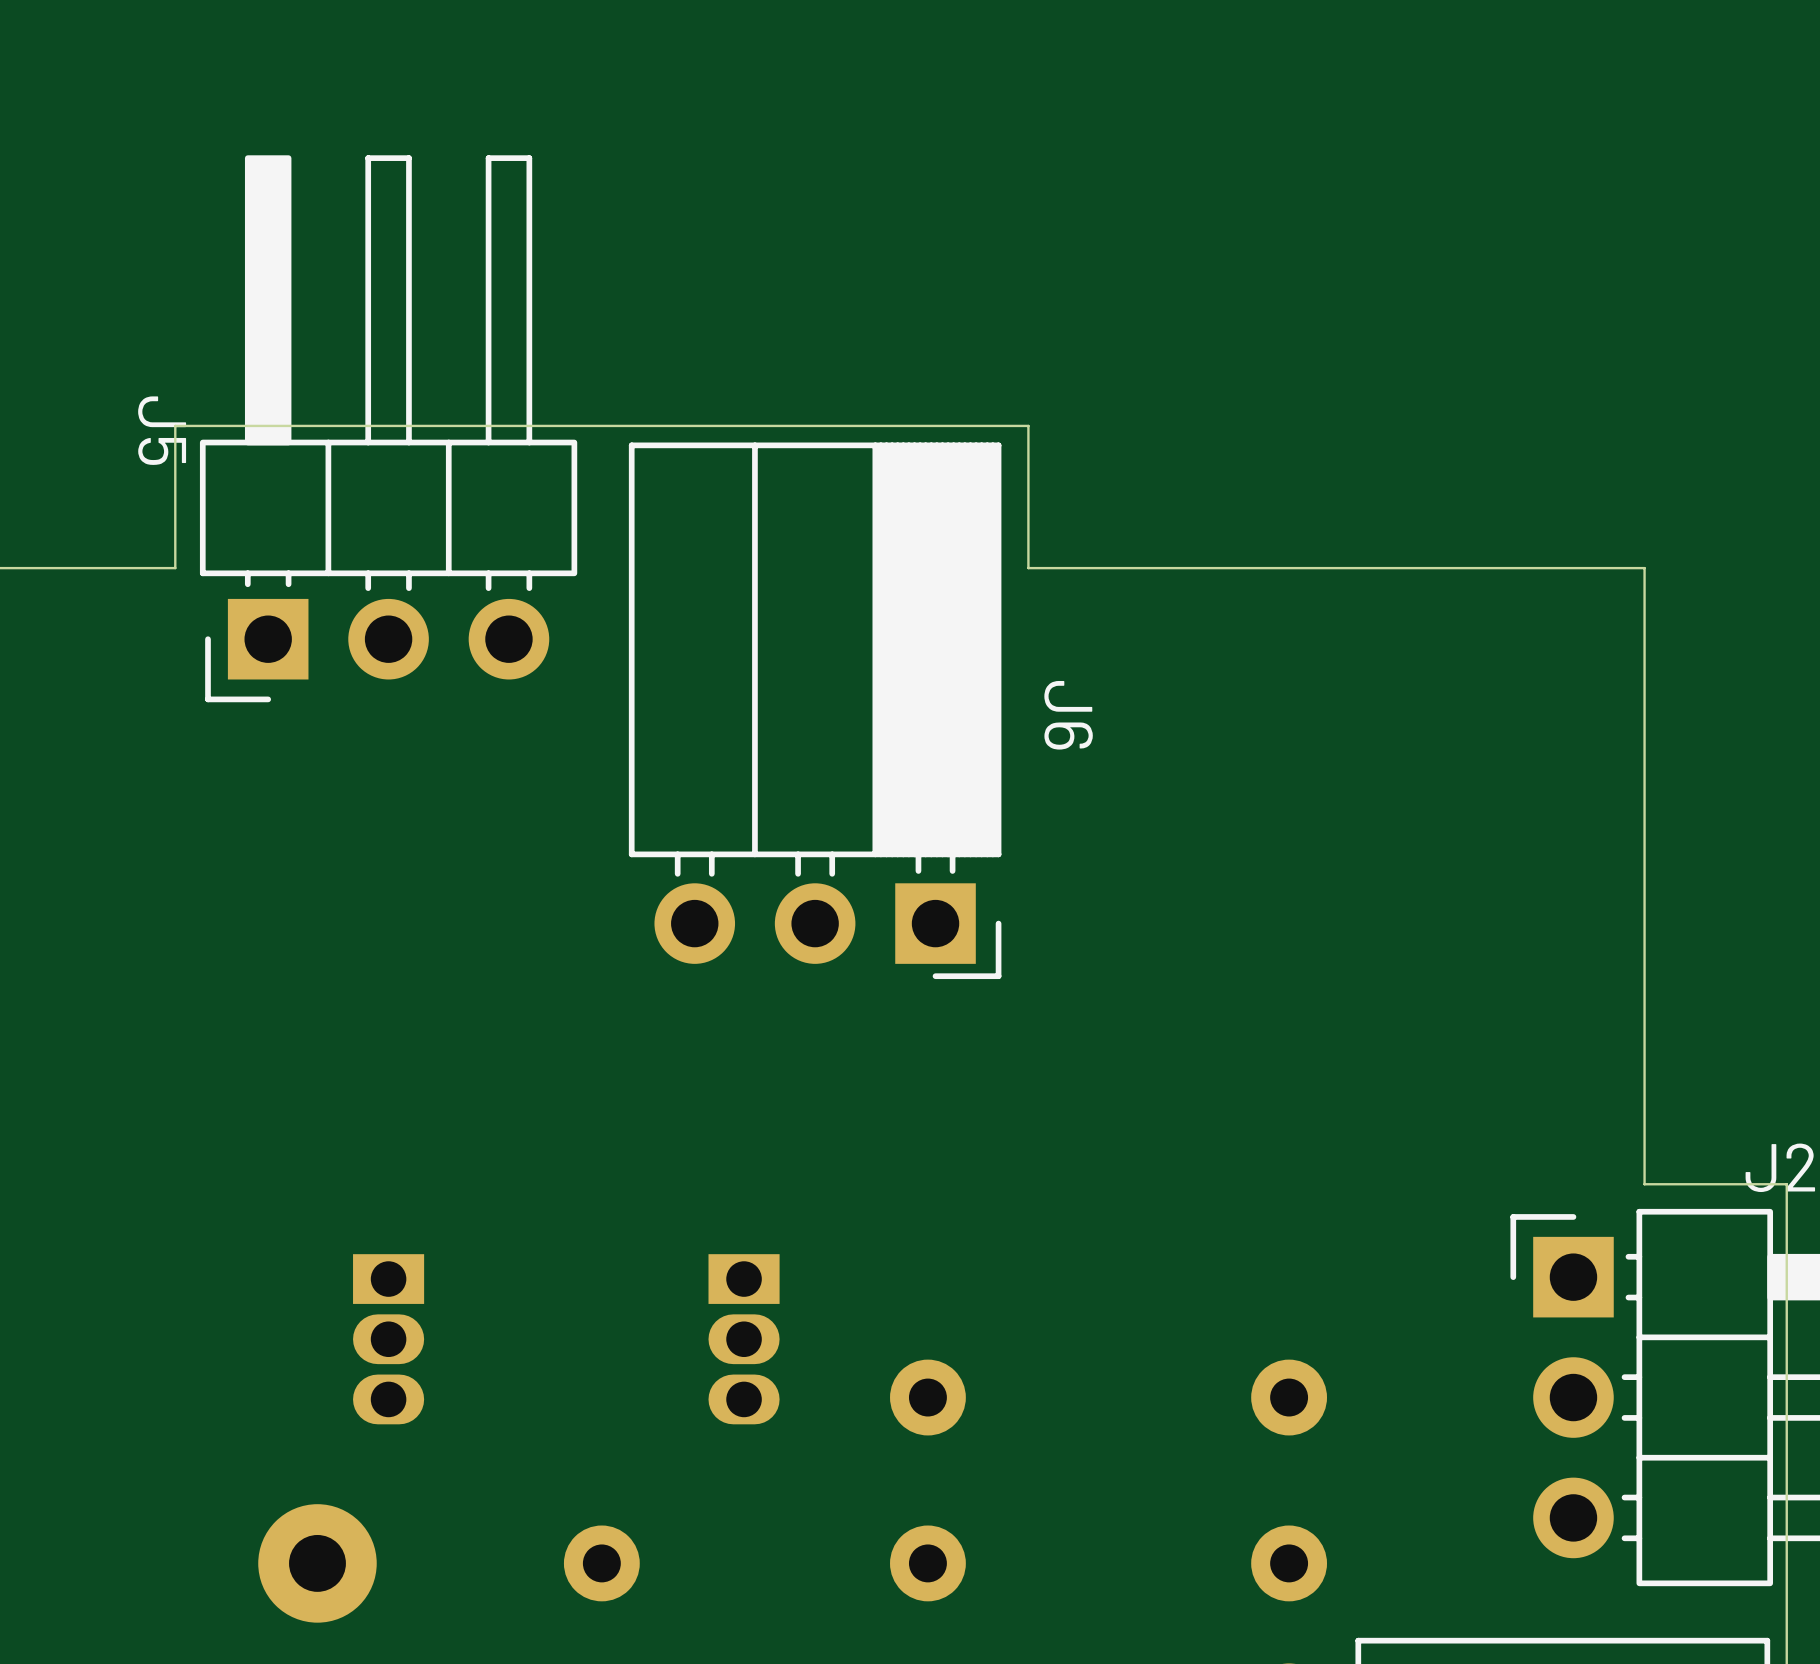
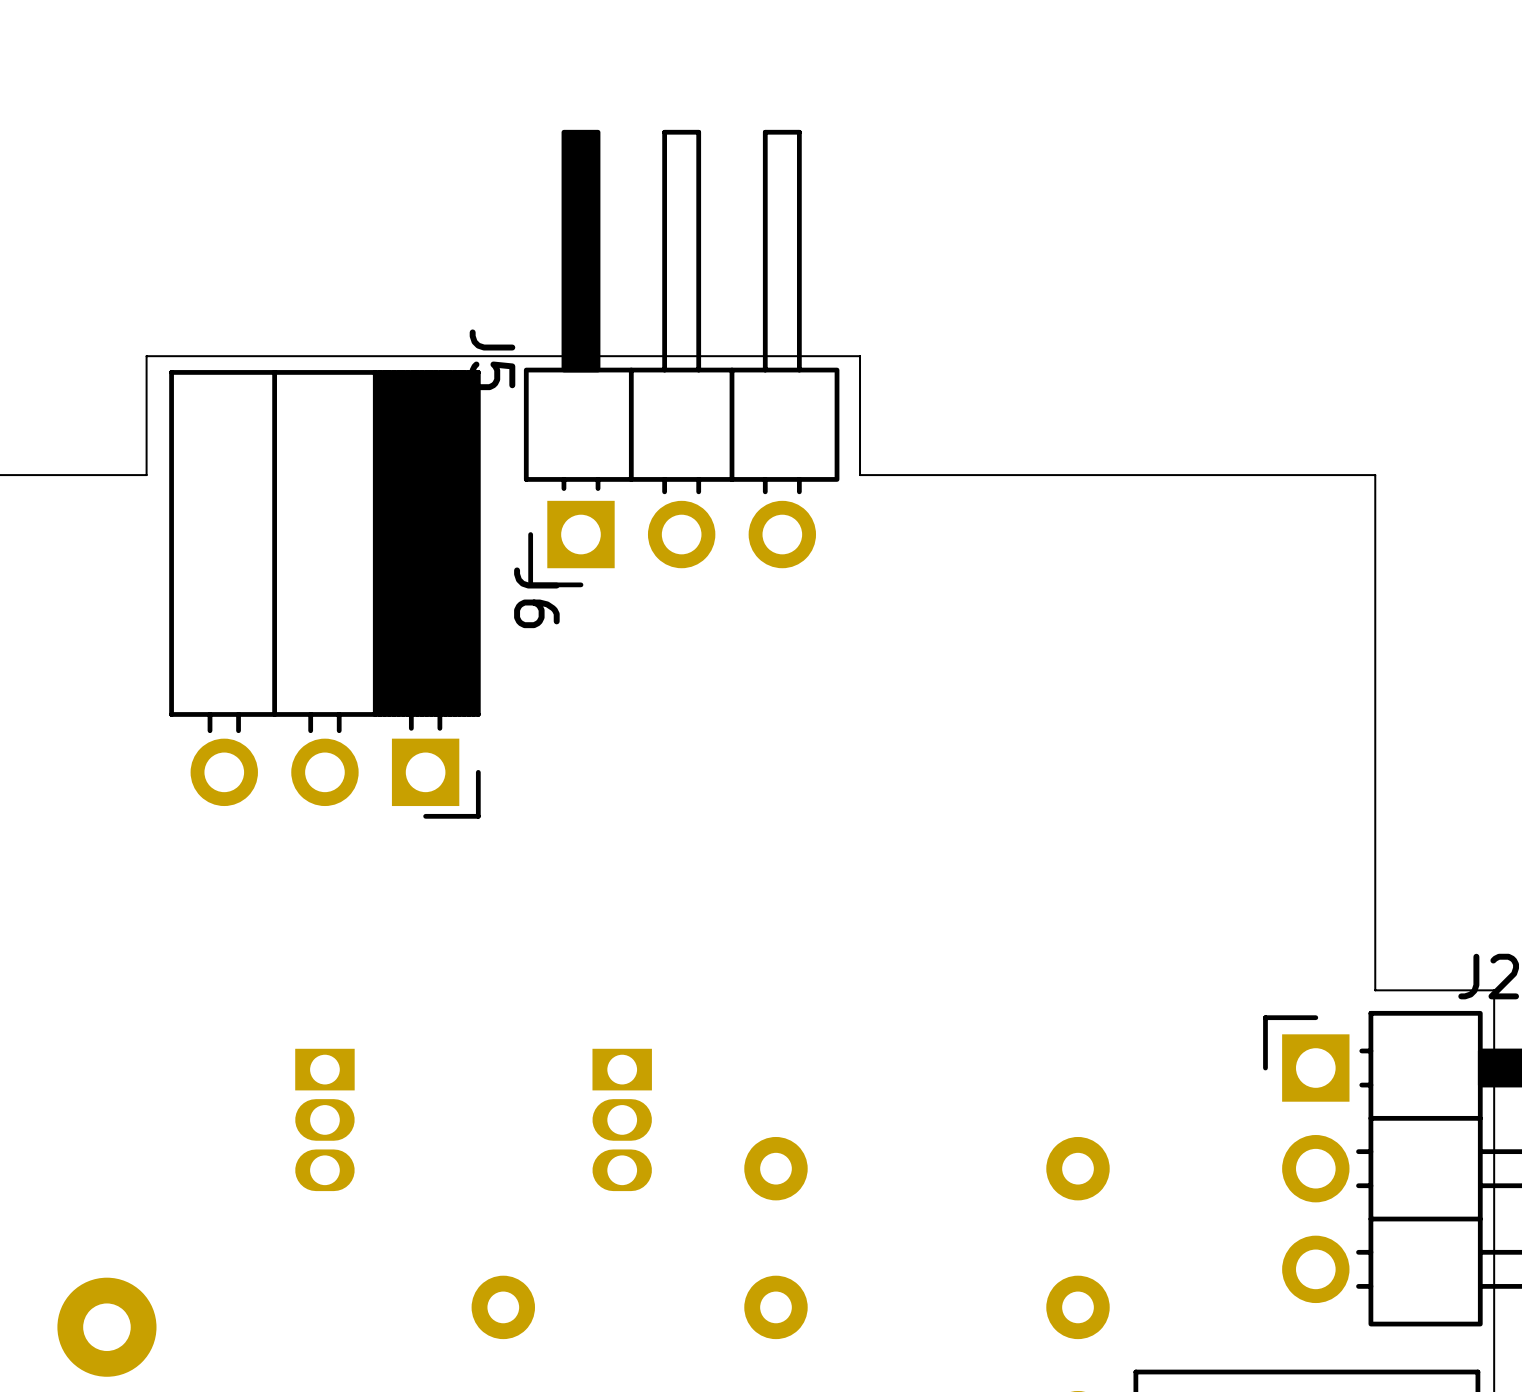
J5 position: (388, 428) -> (681, 358)
J6 position: (815, 710) -> (324, 594)
part: (317, 1563) -> none
part: none -> (106, 1327)

